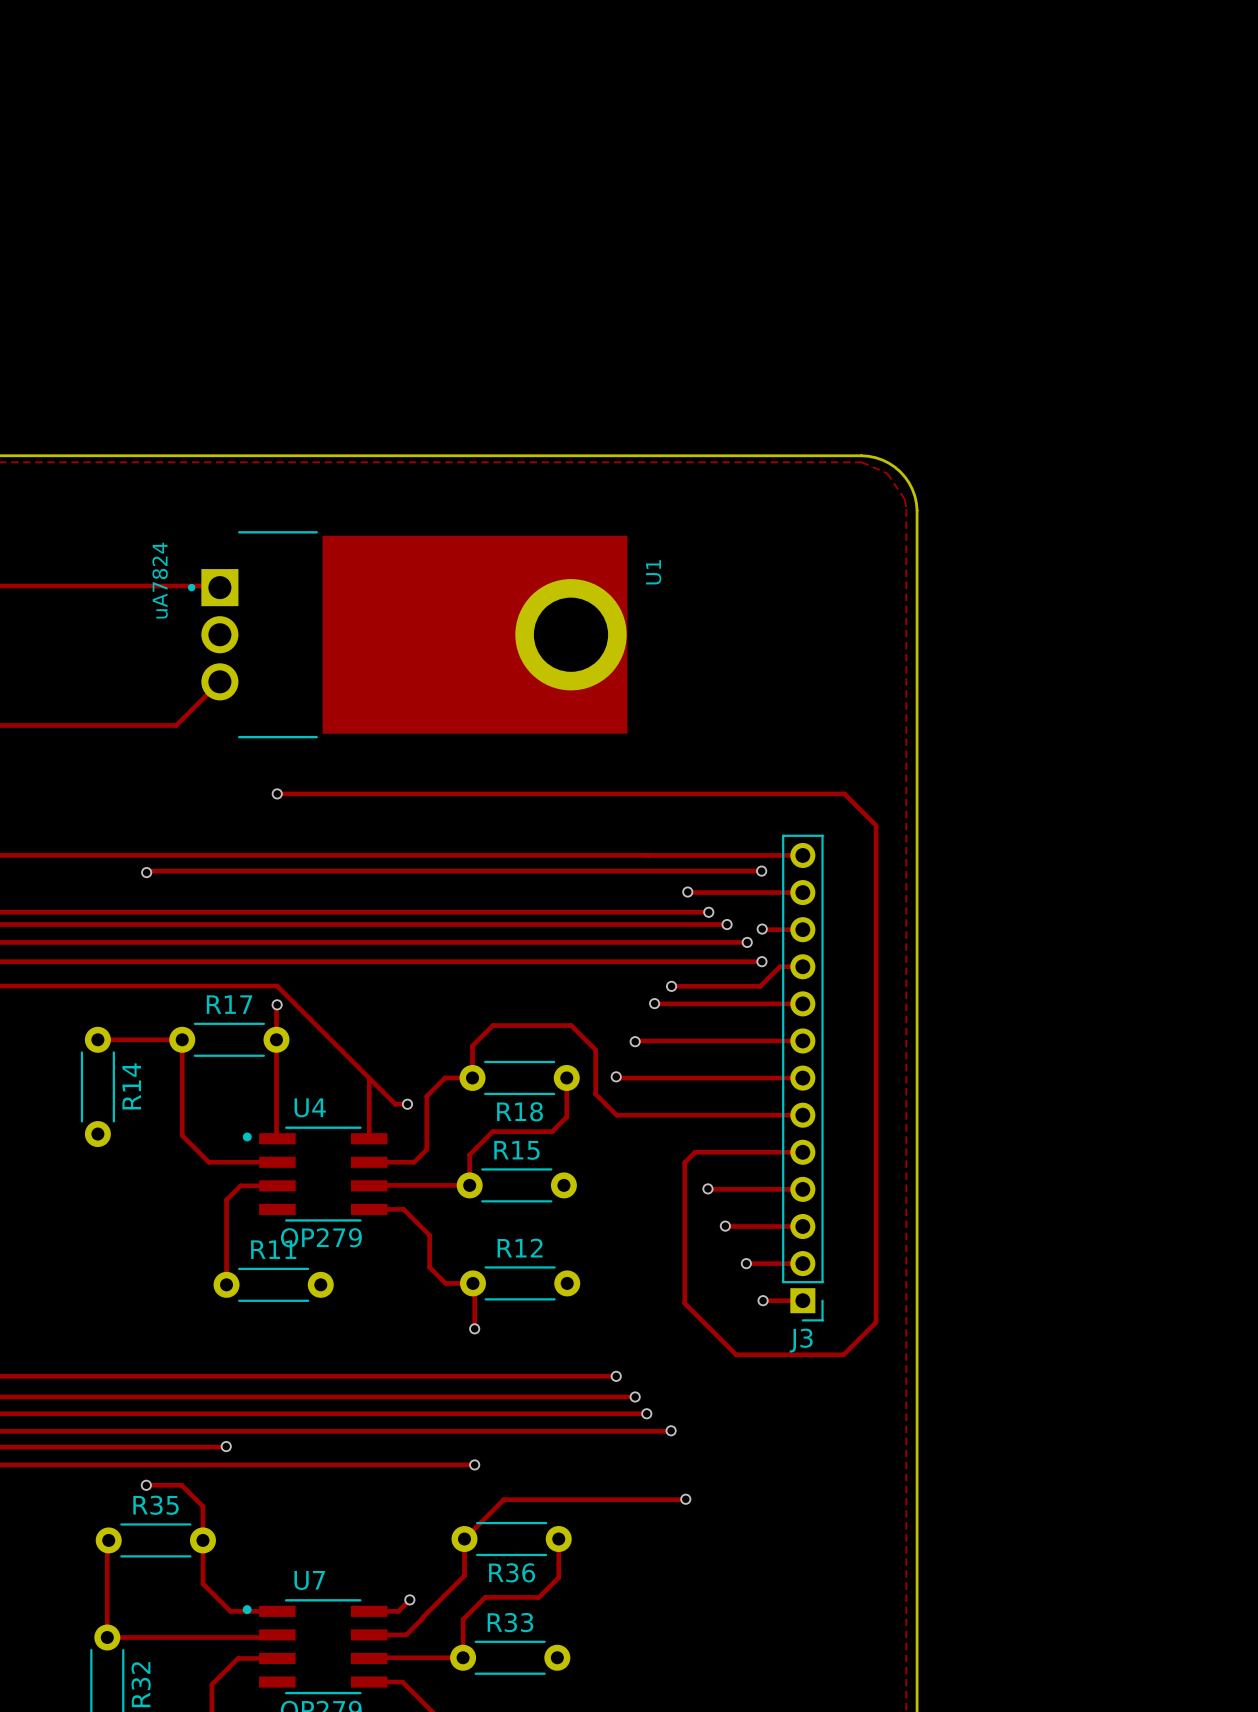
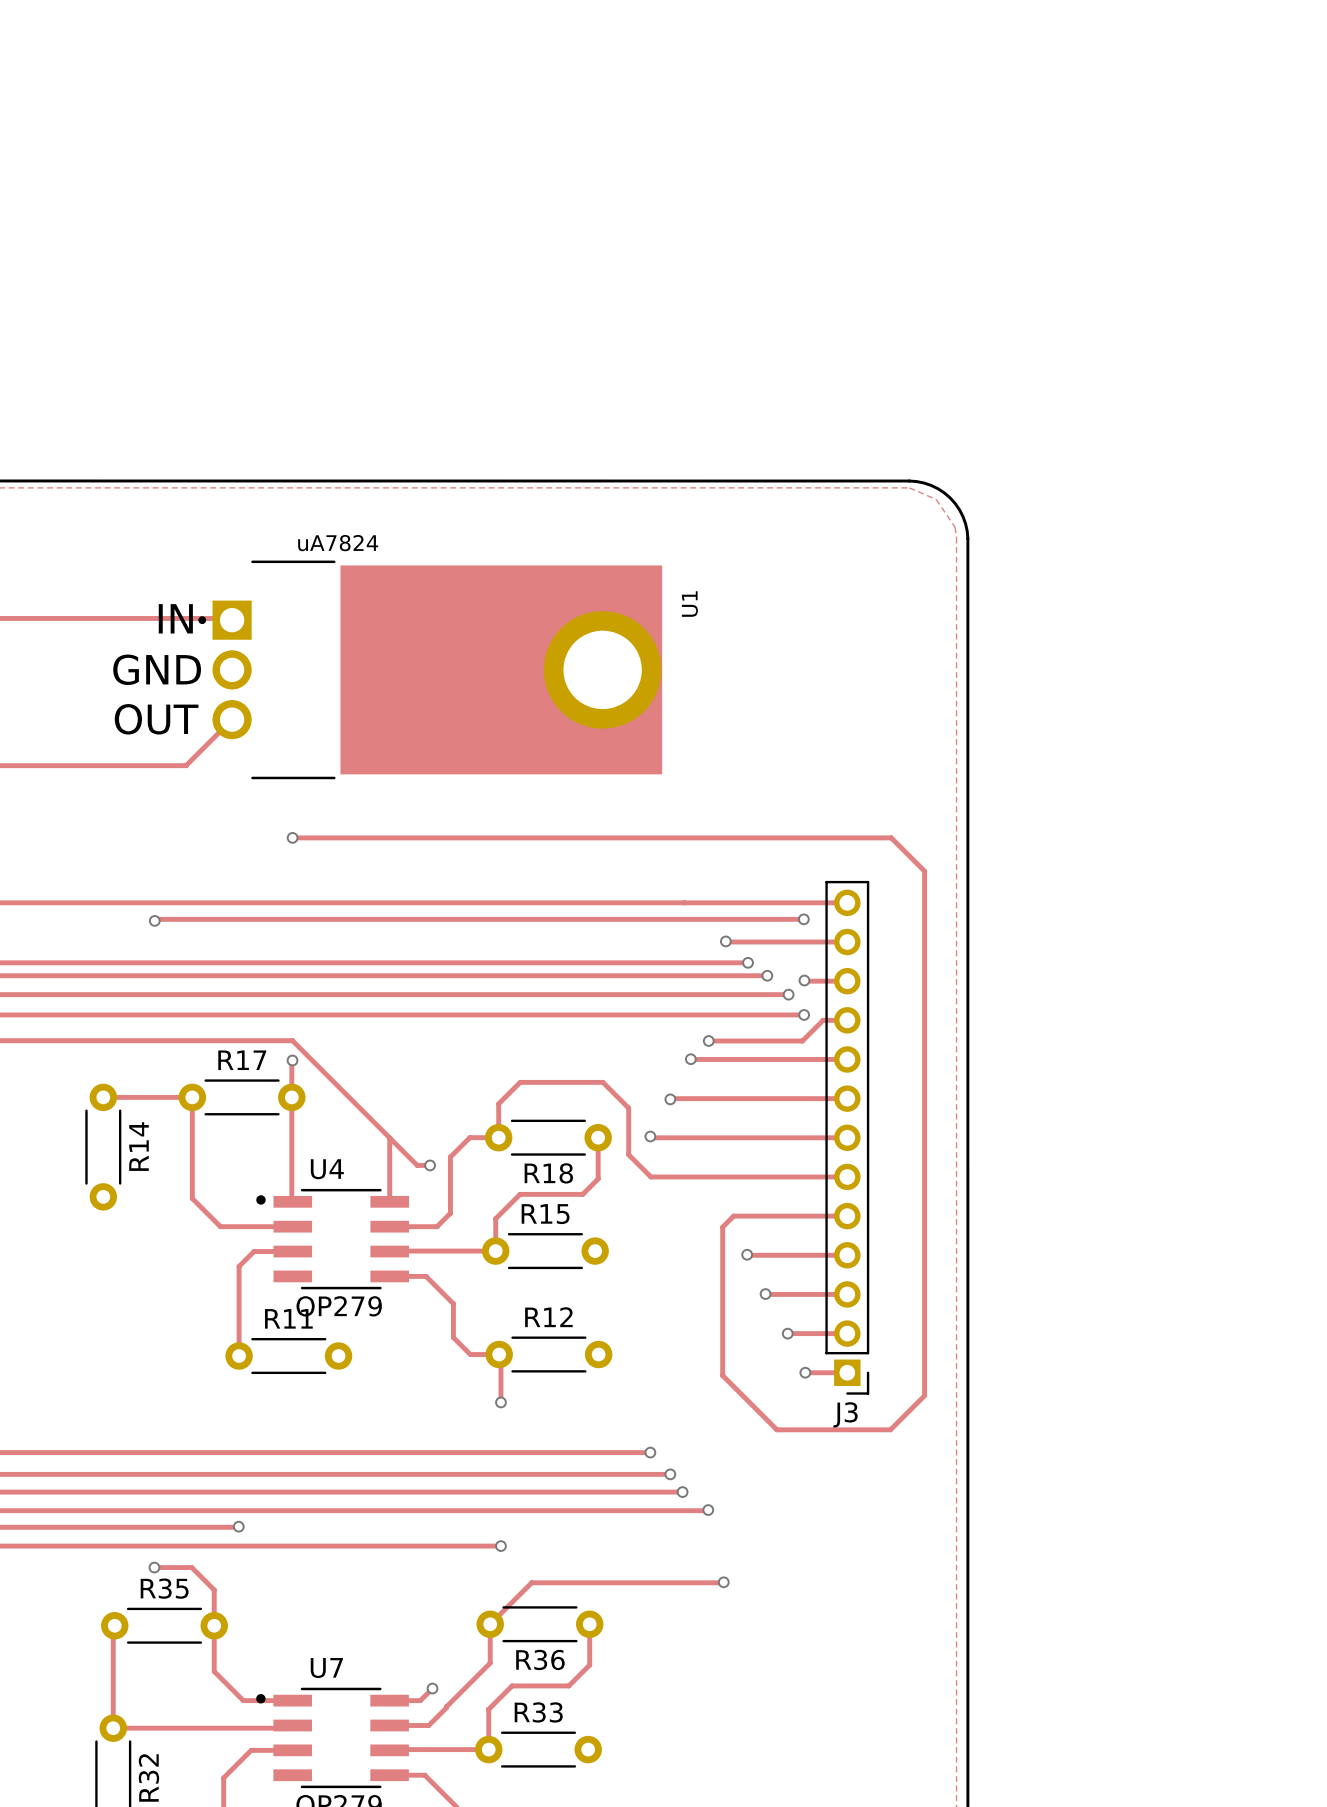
U1 value rotation: 0° (160, 580) -> 90° clockwise (338, 543)
U1 value position: uA7824 (160, 580) -> uA7824 (338, 543)
text: none -> IN (175, 618)
text: none -> GND (157, 669)
text: none -> OUT (156, 719)

